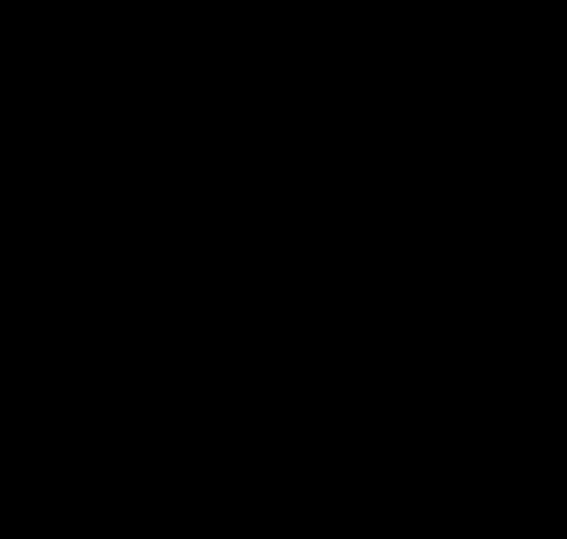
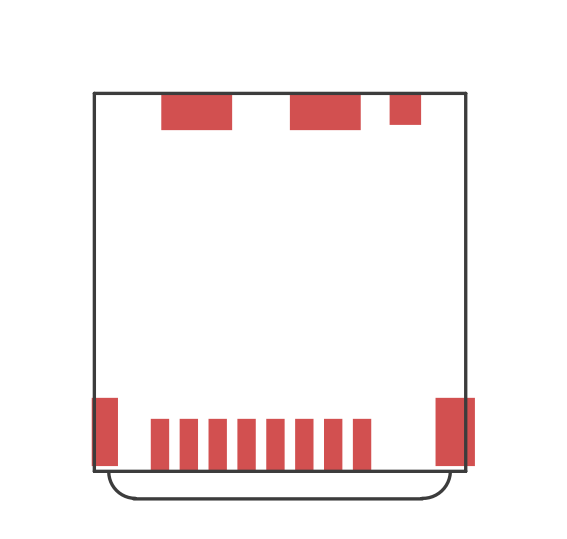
part: none -> (283, 296)

